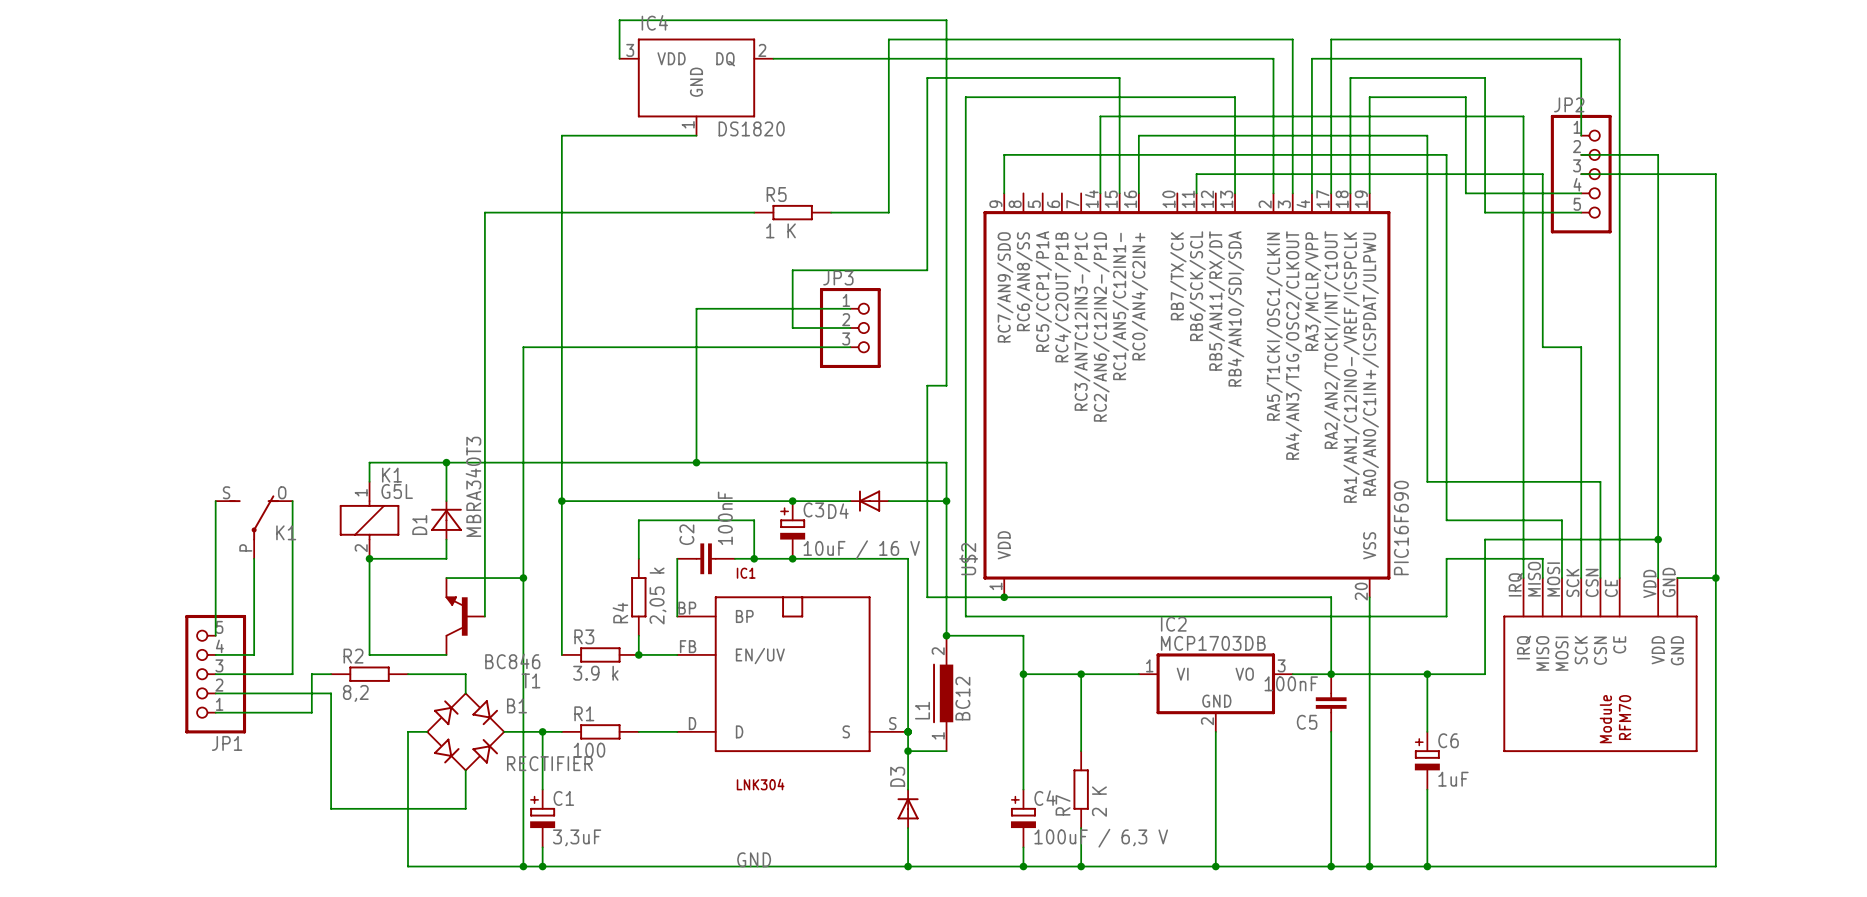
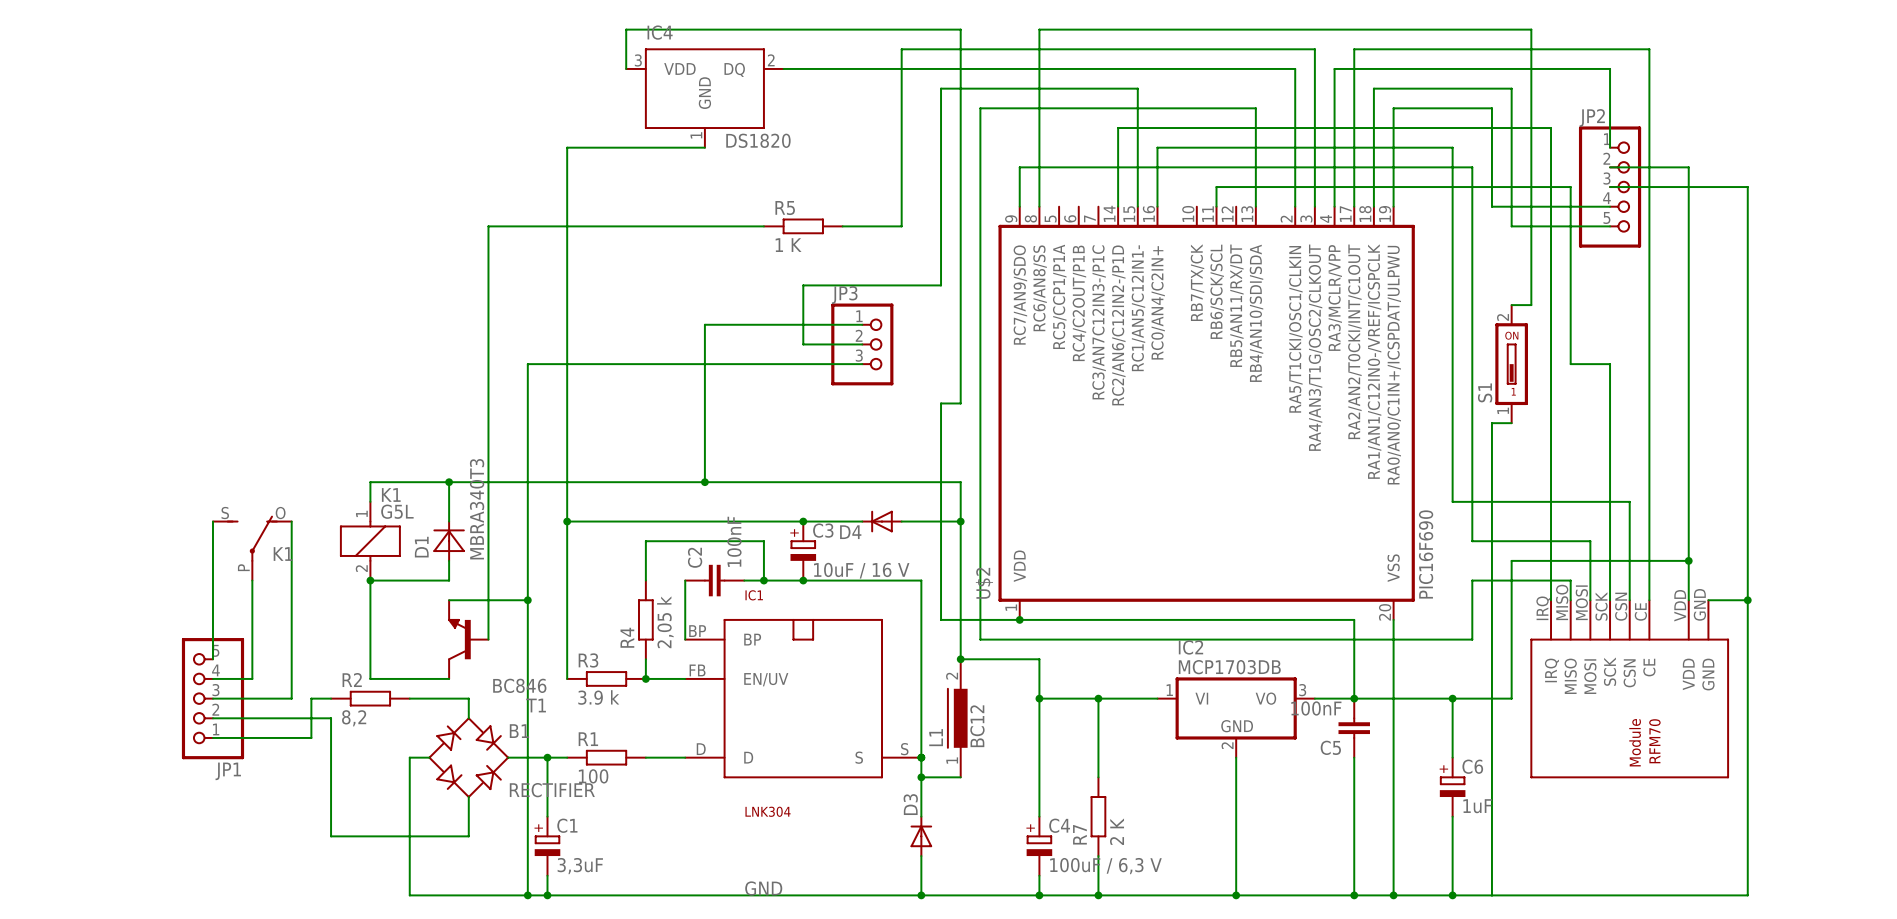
wire: none -> (1039, 206) (1039, 29) (1531, 29) (1531, 305) (1511, 305)
S1: none -> (1511, 364)
wire: none -> (1511, 423) (1491, 423) (1491, 895)

